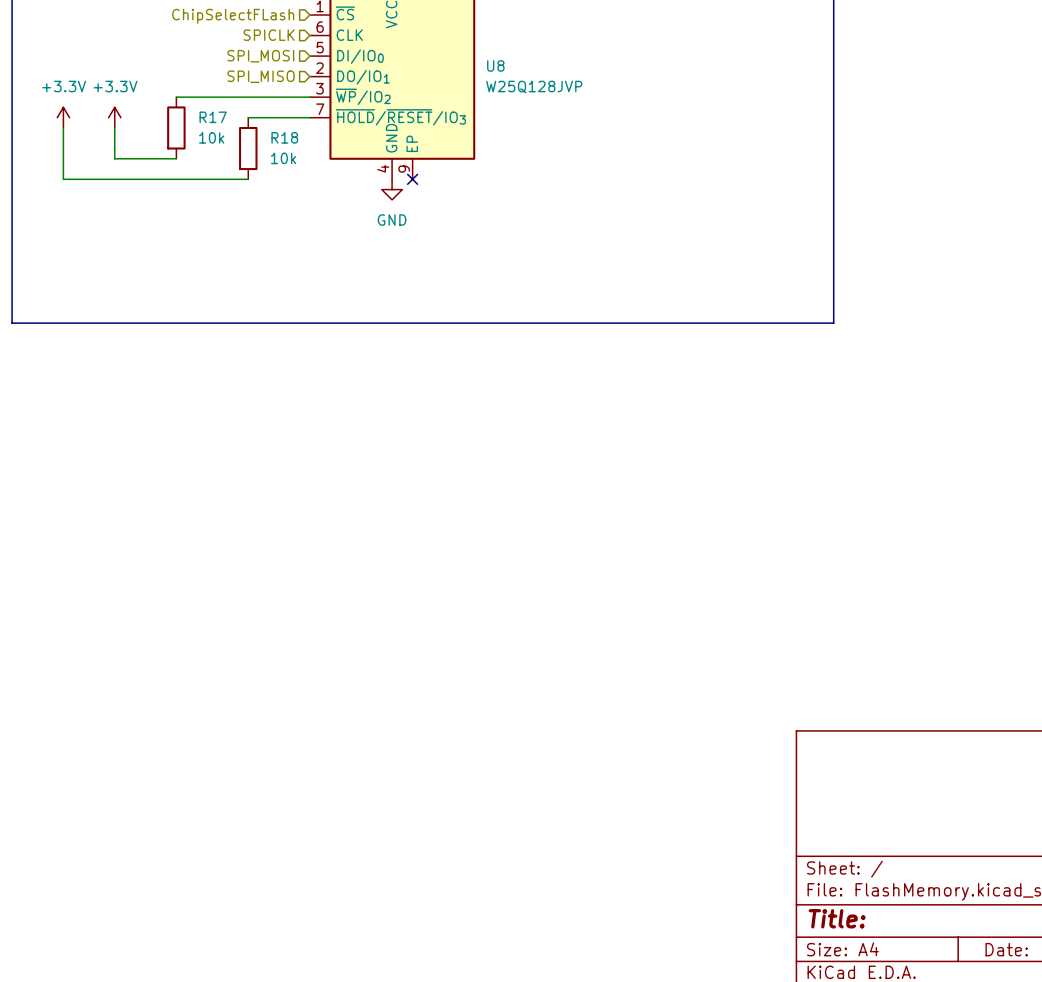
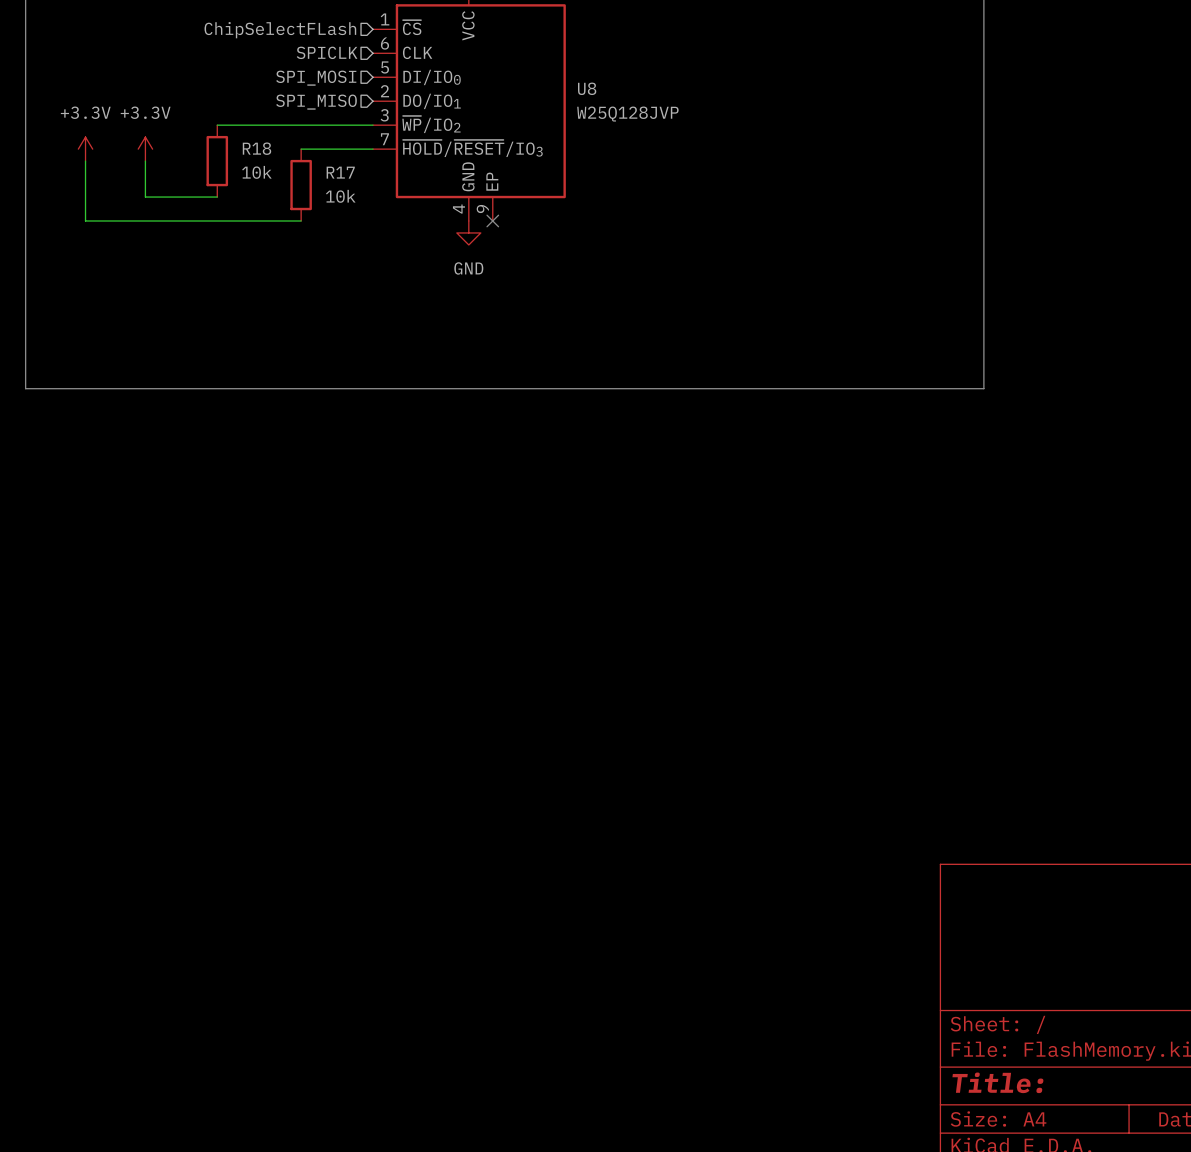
R17 name: R17 (213, 117) -> R18 (256, 148)
R18 name: R18 (284, 137) -> R17 (340, 172)

